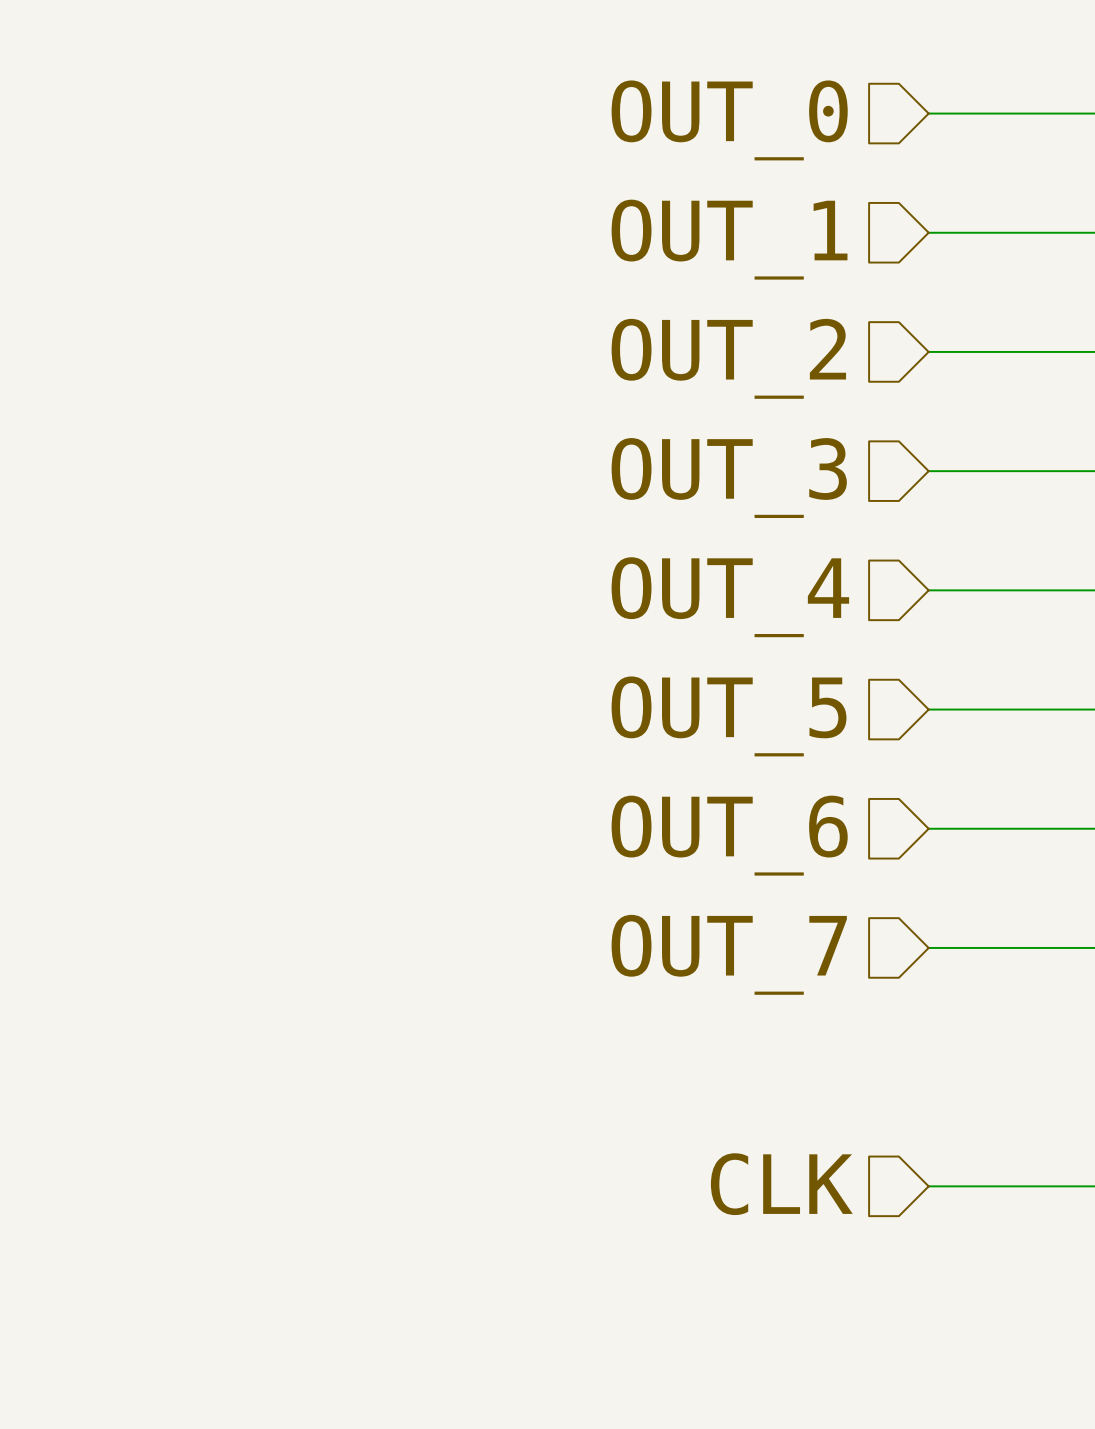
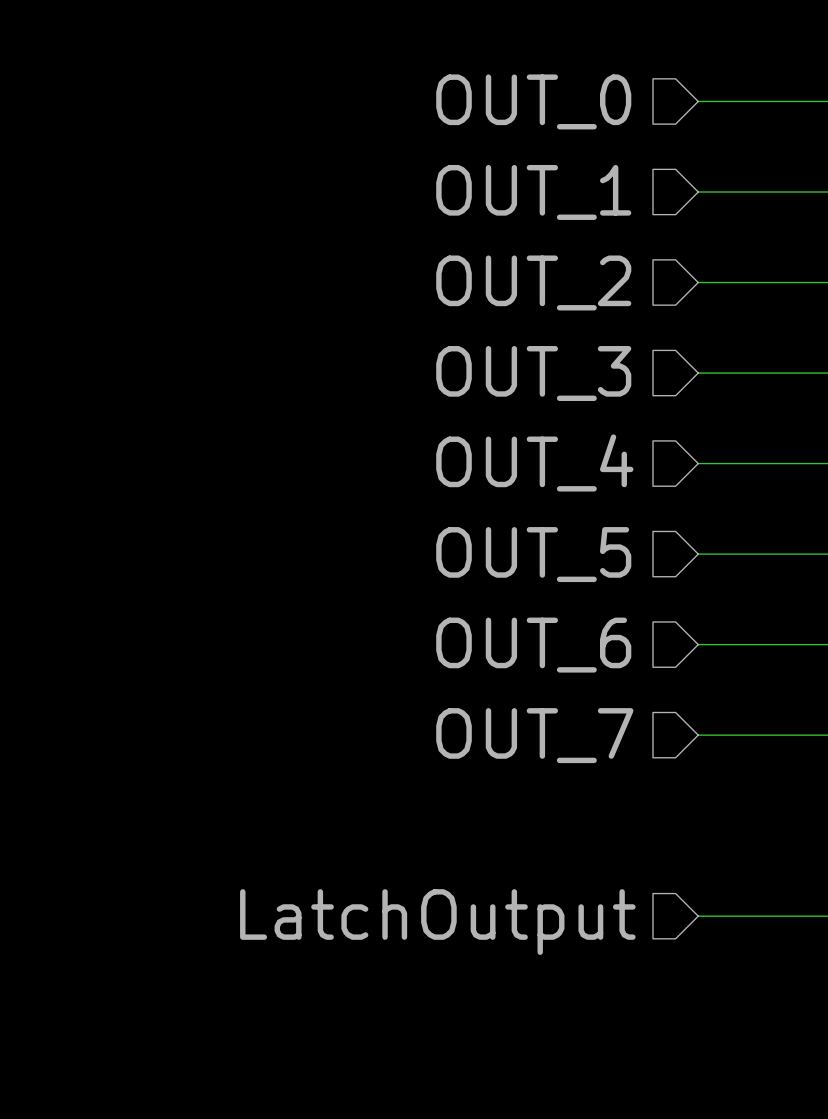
hierarchical label: CLK (781, 1184) -> LatchOutput (437, 922)

